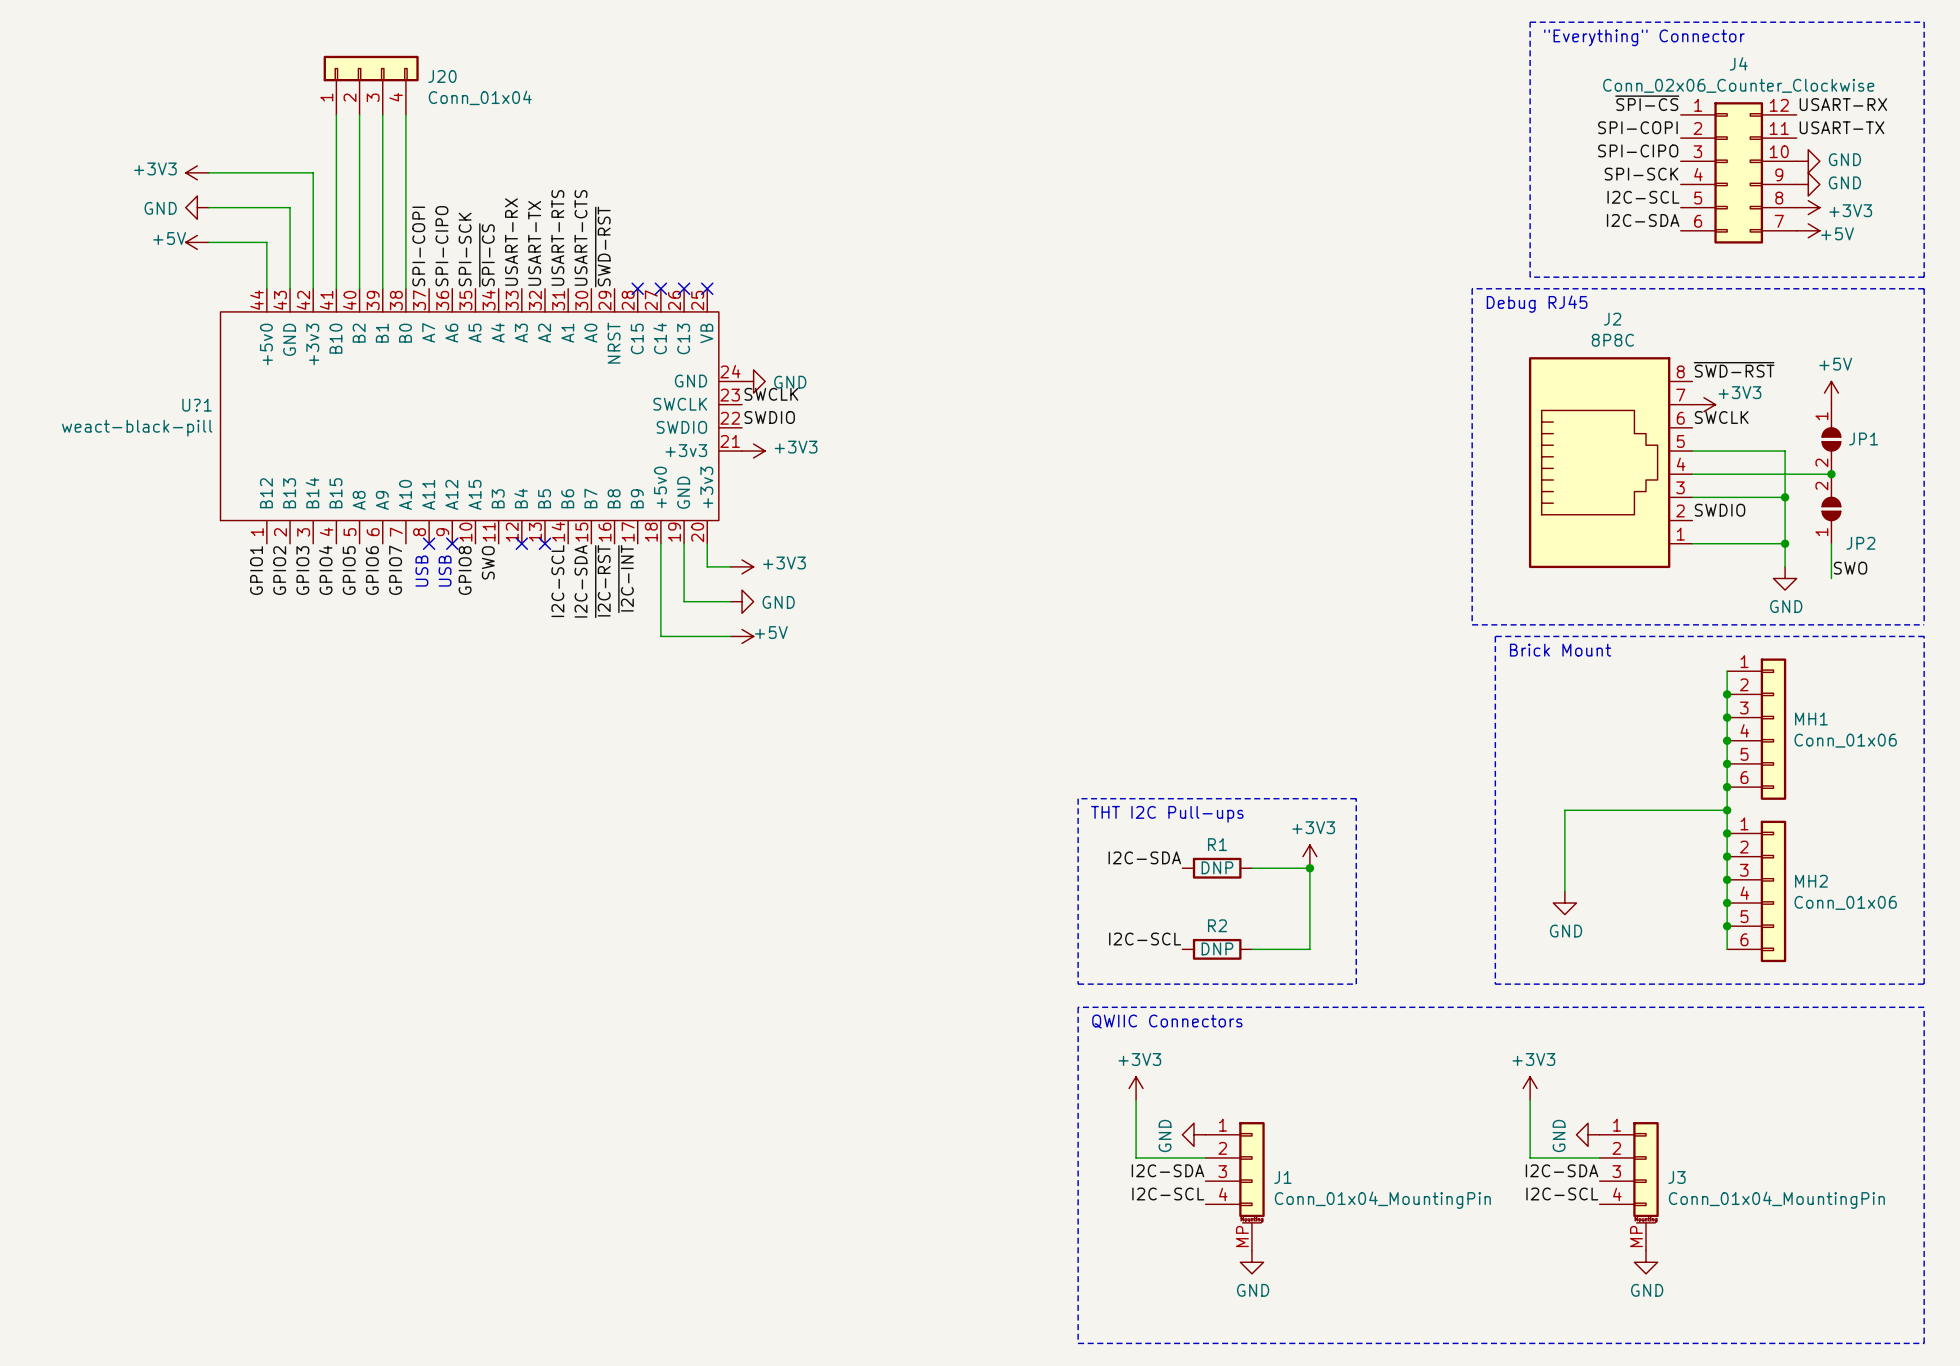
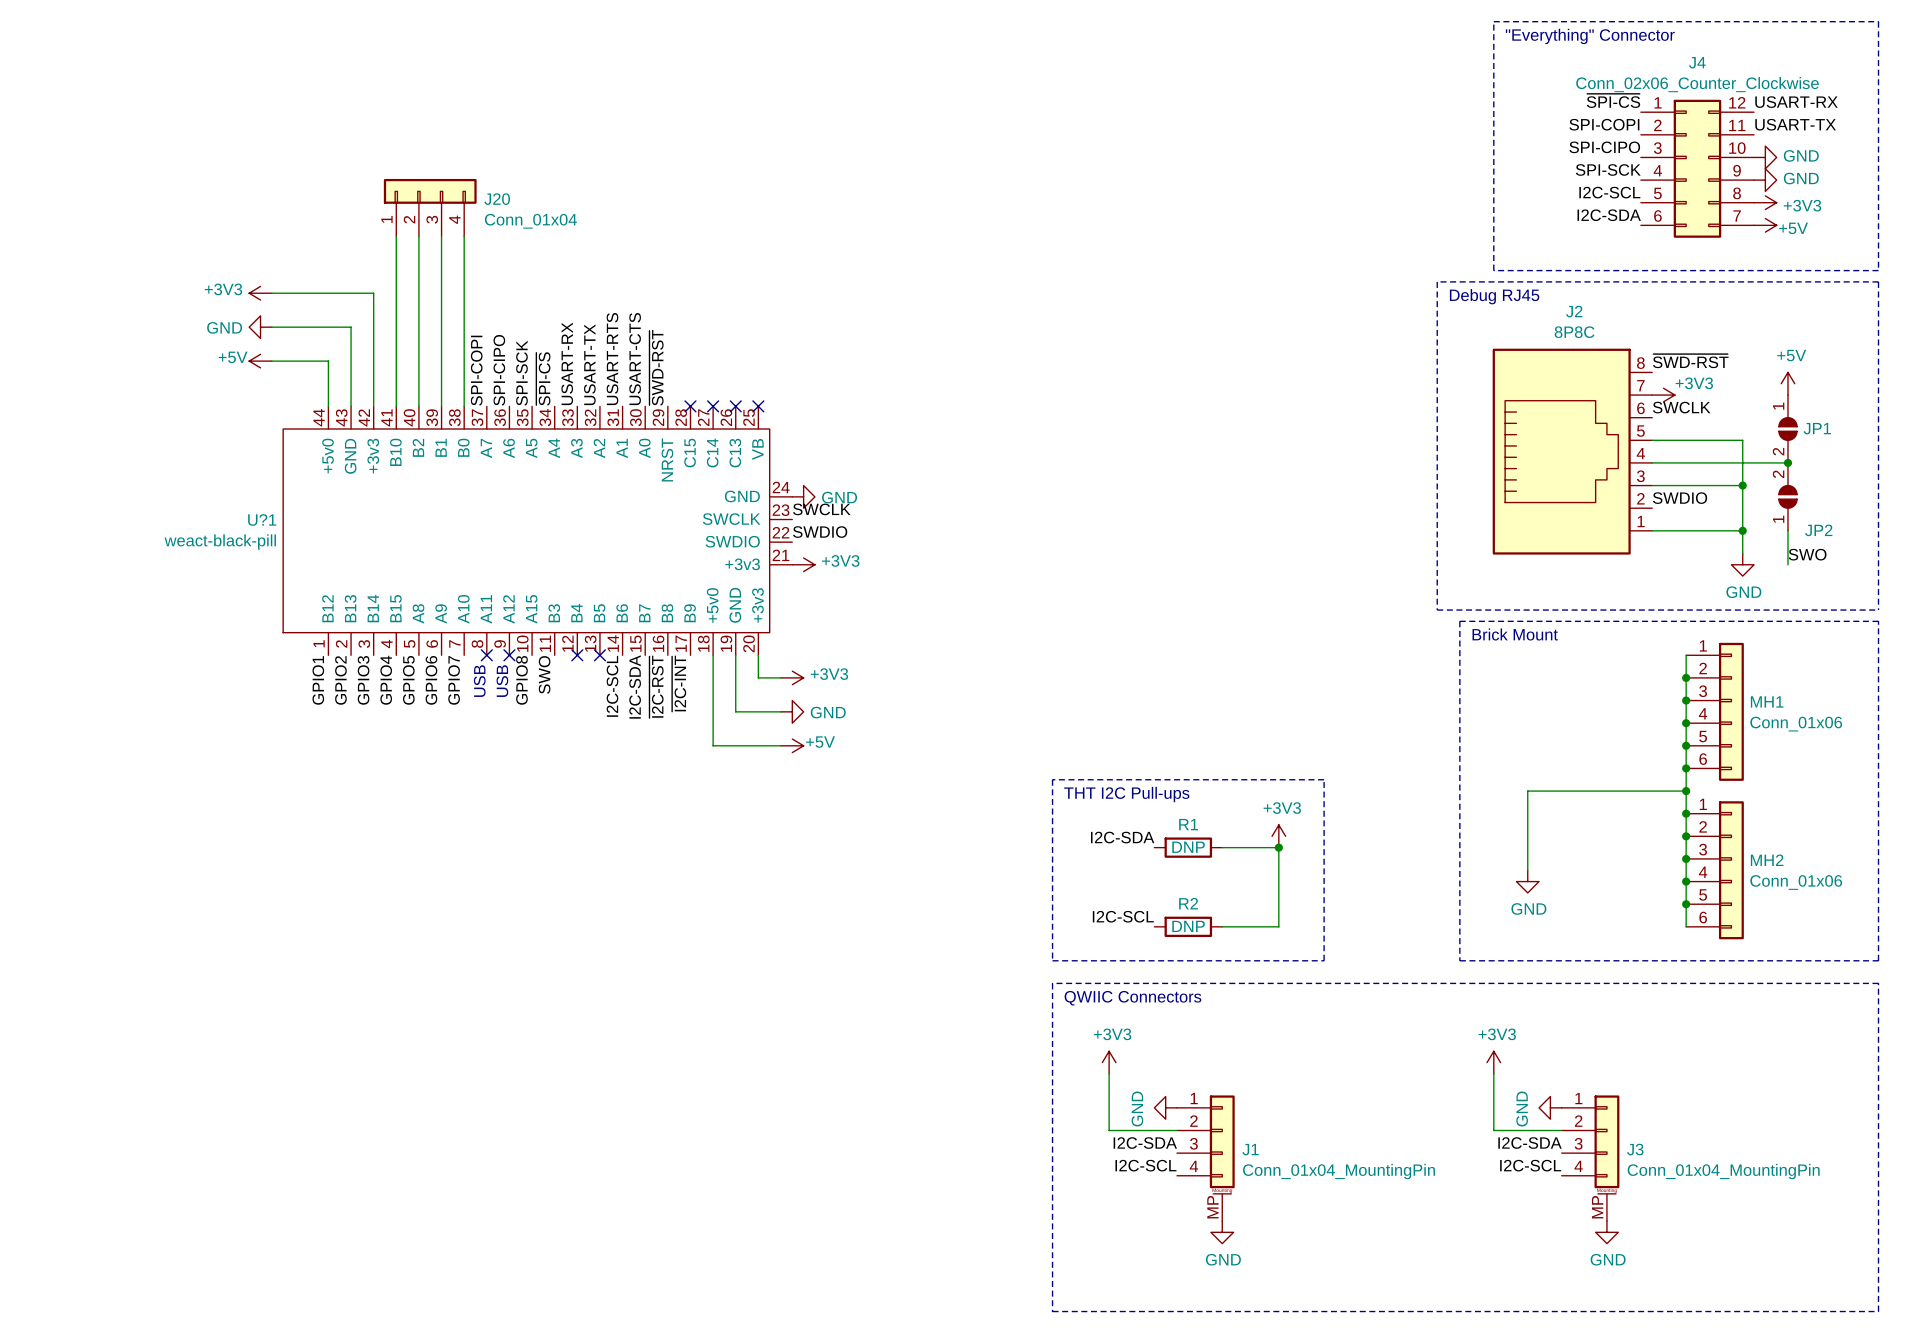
J20 position: (371, 85) -> (430, 207)
wire: (336, 114) (336, 288) -> (464, 236) (464, 406)
wire: (359, 114) (359, 288) -> (418, 236) (418, 406)
wire: (382, 114) (382, 288) -> (441, 236) (441, 406)
wire: (405, 114) (405, 242) -> (396, 281) (396, 406)
power symbol position: +3V3 (197, 172) -> +3V3 (260, 293)
wire: (208, 172) (313, 172) (313, 288) -> (271, 293) (373, 293) (373, 406)
power symbol position: GND (197, 207) -> GND (260, 327)
wire: (208, 207) (290, 207) (290, 288) -> (271, 327) (351, 327) (351, 406)
label position: USART-RTS (557, 237) -> USART-RTS (612, 359)
label position: USART-CTS (581, 237) -> USART-CTS (635, 359)
power symbol position: +5V (197, 242) -> +5V (260, 361)
wire: (208, 242) (266, 242) (266, 288) -> (271, 361) (328, 361) (328, 406)
label position: USART-RX (511, 242) -> USART-RX (567, 363)
label position: USART-TX (534, 243) -> USART-TX (589, 364)
label position: SPI-COPI (418, 246) -> SPI-COPI (476, 370)
label position: SPI-CIPO (441, 246) -> SPI-CIPO (499, 370)
label position: ~{SWD-RST} (602, 246) -> ~{SWD-RST} (656, 367)
label position: SPI-SCK (465, 249) -> SPI-SCK (521, 373)
label position: ~{SPI-CS} (486, 255) -> ~{SPI-CS} (543, 378)
no-connect mark: (637, 288) -> none
no-connect mark: (660, 288) -> none
no-connect mark: (684, 288) -> none
no-connect mark: (707, 288) -> none
power symbol: GND (753, 381) -> none
label position: SWCLK (771, 394) -> SWCLK (821, 509)
U?1 position: (481, 416) -> (537, 530)
no-connect mark: none -> (690, 406)
no-connect mark: none -> (713, 406)
no-connect mark: none -> (735, 406)
no-connect mark: none -> (758, 406)
label position: SWDIO (769, 417) -> SWDIO (820, 532)
power symbol: +3V3 (753, 451) -> none
power symbol: none -> GND (803, 496)
no-connect mark: (429, 543) -> none
no-connect mark: (452, 543) -> none
no-connect mark: (521, 543) -> none
no-connect mark: (545, 543) -> none
wire: (660, 543) (660, 636) (730, 636) -> (713, 655) (713, 745) (780, 745)
wire: (684, 543) (684, 601) (730, 601) -> (735, 655) (735, 711) (780, 711)
wire: (707, 543) (707, 566) (730, 566) -> (758, 655) (758, 677) (780, 677)
label position: SWO (488, 562) -> SWO (544, 674)
power symbol: +3V3 (742, 566) -> none
label position: GPIO1 (256, 570) -> GPIO1 (318, 680)
label position: GPIO2 (279, 570) -> GPIO2 (340, 680)
label position: GPIO3 (302, 570) -> GPIO3 (363, 680)
label position: GPIO4 (325, 570) -> GPIO4 (386, 680)
label position: GPIO5 (349, 570) -> GPIO5 (408, 680)
label position: GPIO6 (372, 570) -> GPIO6 (431, 680)
label position: GPIO7 (395, 570) -> GPIO7 (454, 680)
label position: GPIO8 (465, 570) -> GPIO8 (521, 680)
text: USB (421, 571) -> none
text: USB (445, 571) -> none
power symbol: none -> +3V3 (803, 564)
label position: ~{I2C-INT} (626, 579) -> ~{I2C-INT} (679, 683)
label position: I2C-SCL (557, 581) -> I2C-SCL (612, 686)
label position: I2C-SDA (581, 581) -> I2C-SDA (635, 686)
label position: ~{I2C-RST} (602, 581) -> ~{I2C-RST} (656, 686)
power symbol: GND (742, 601) -> none
power symbol position: +5V (742, 636) -> +5V (792, 745)
no-connect mark: none -> (486, 655)
no-connect mark: none -> (509, 655)
no-connect mark: none -> (577, 655)
no-connect mark: none -> (599, 655)
power symbol: none -> +3V3 (792, 677)
text: none -> USB (479, 681)
text: none -> USB (502, 681)
power symbol: none -> GND (792, 711)

